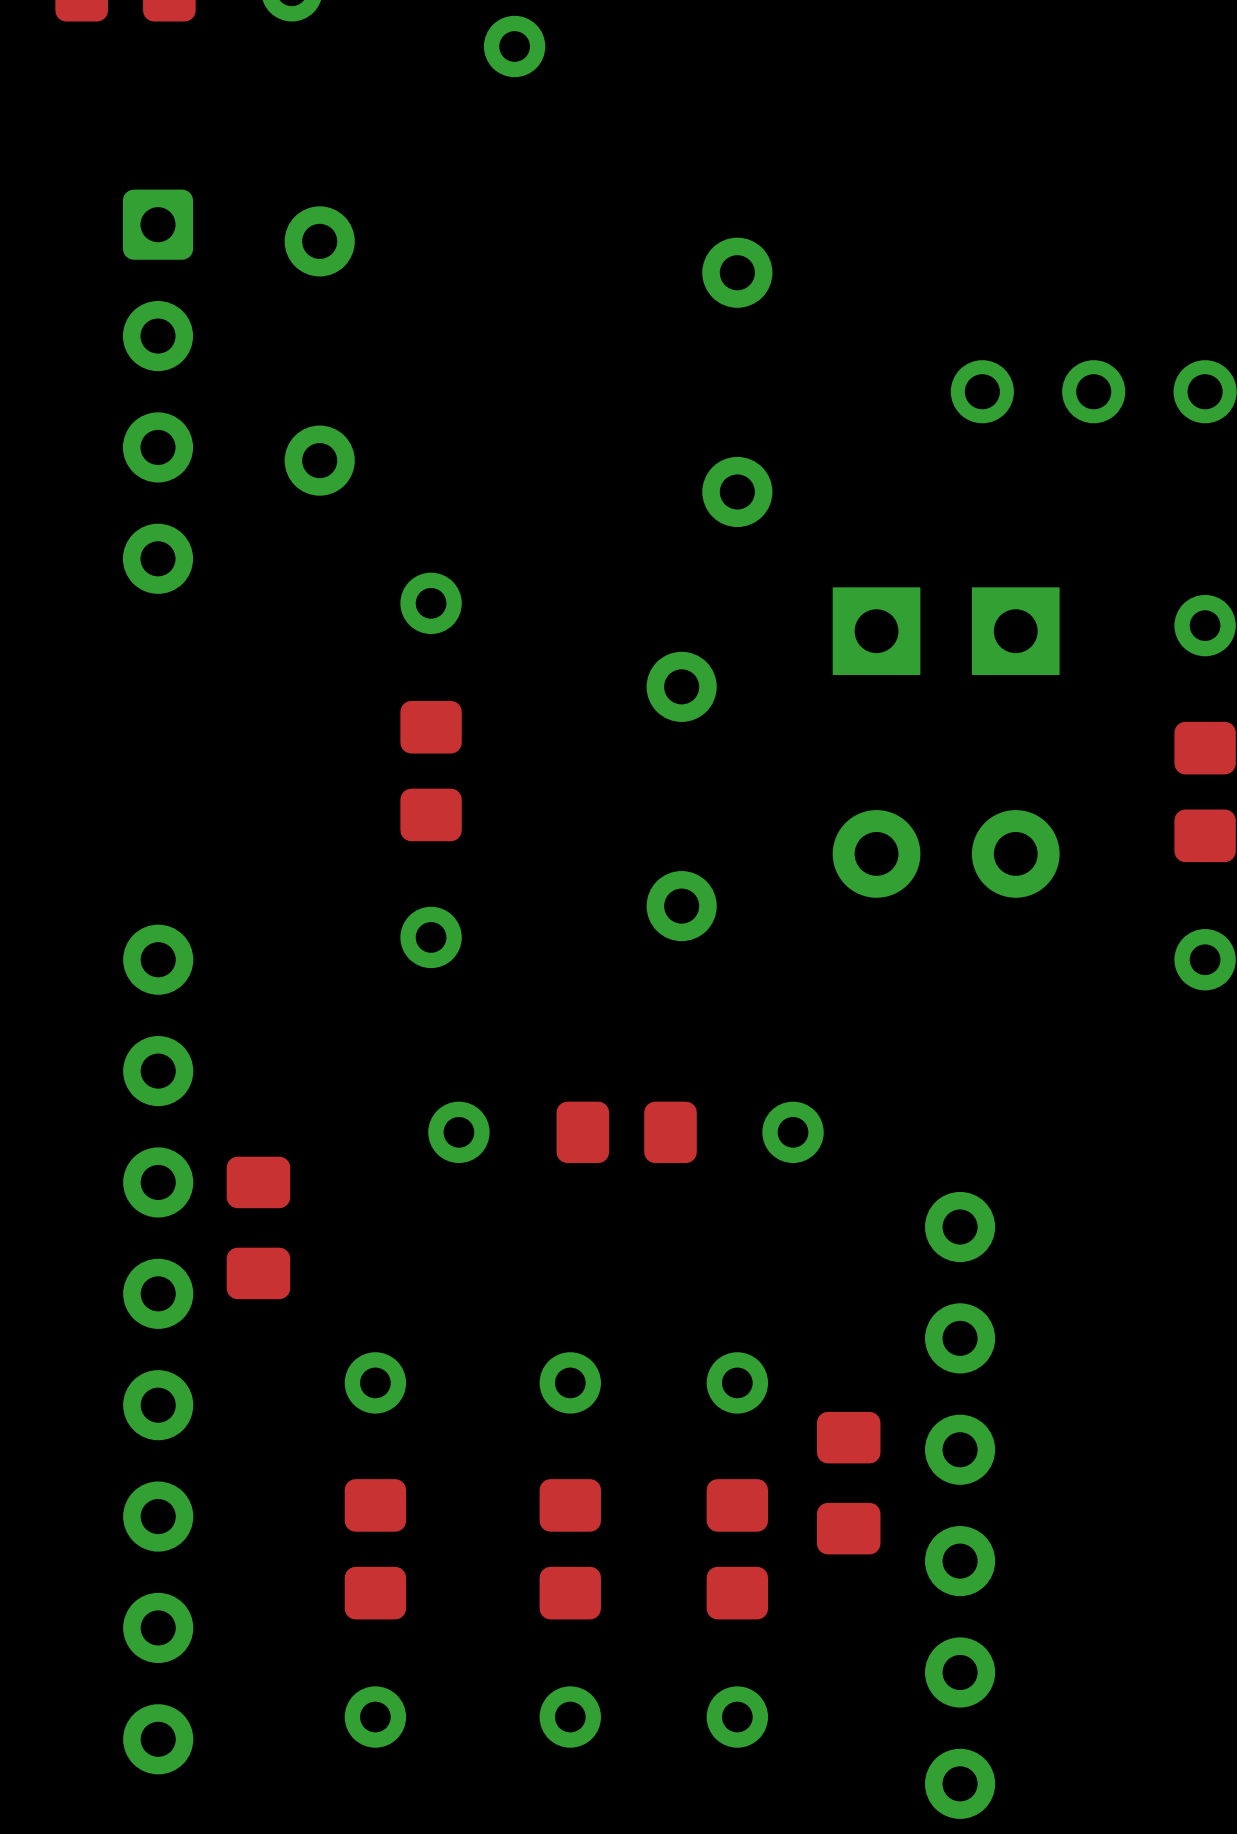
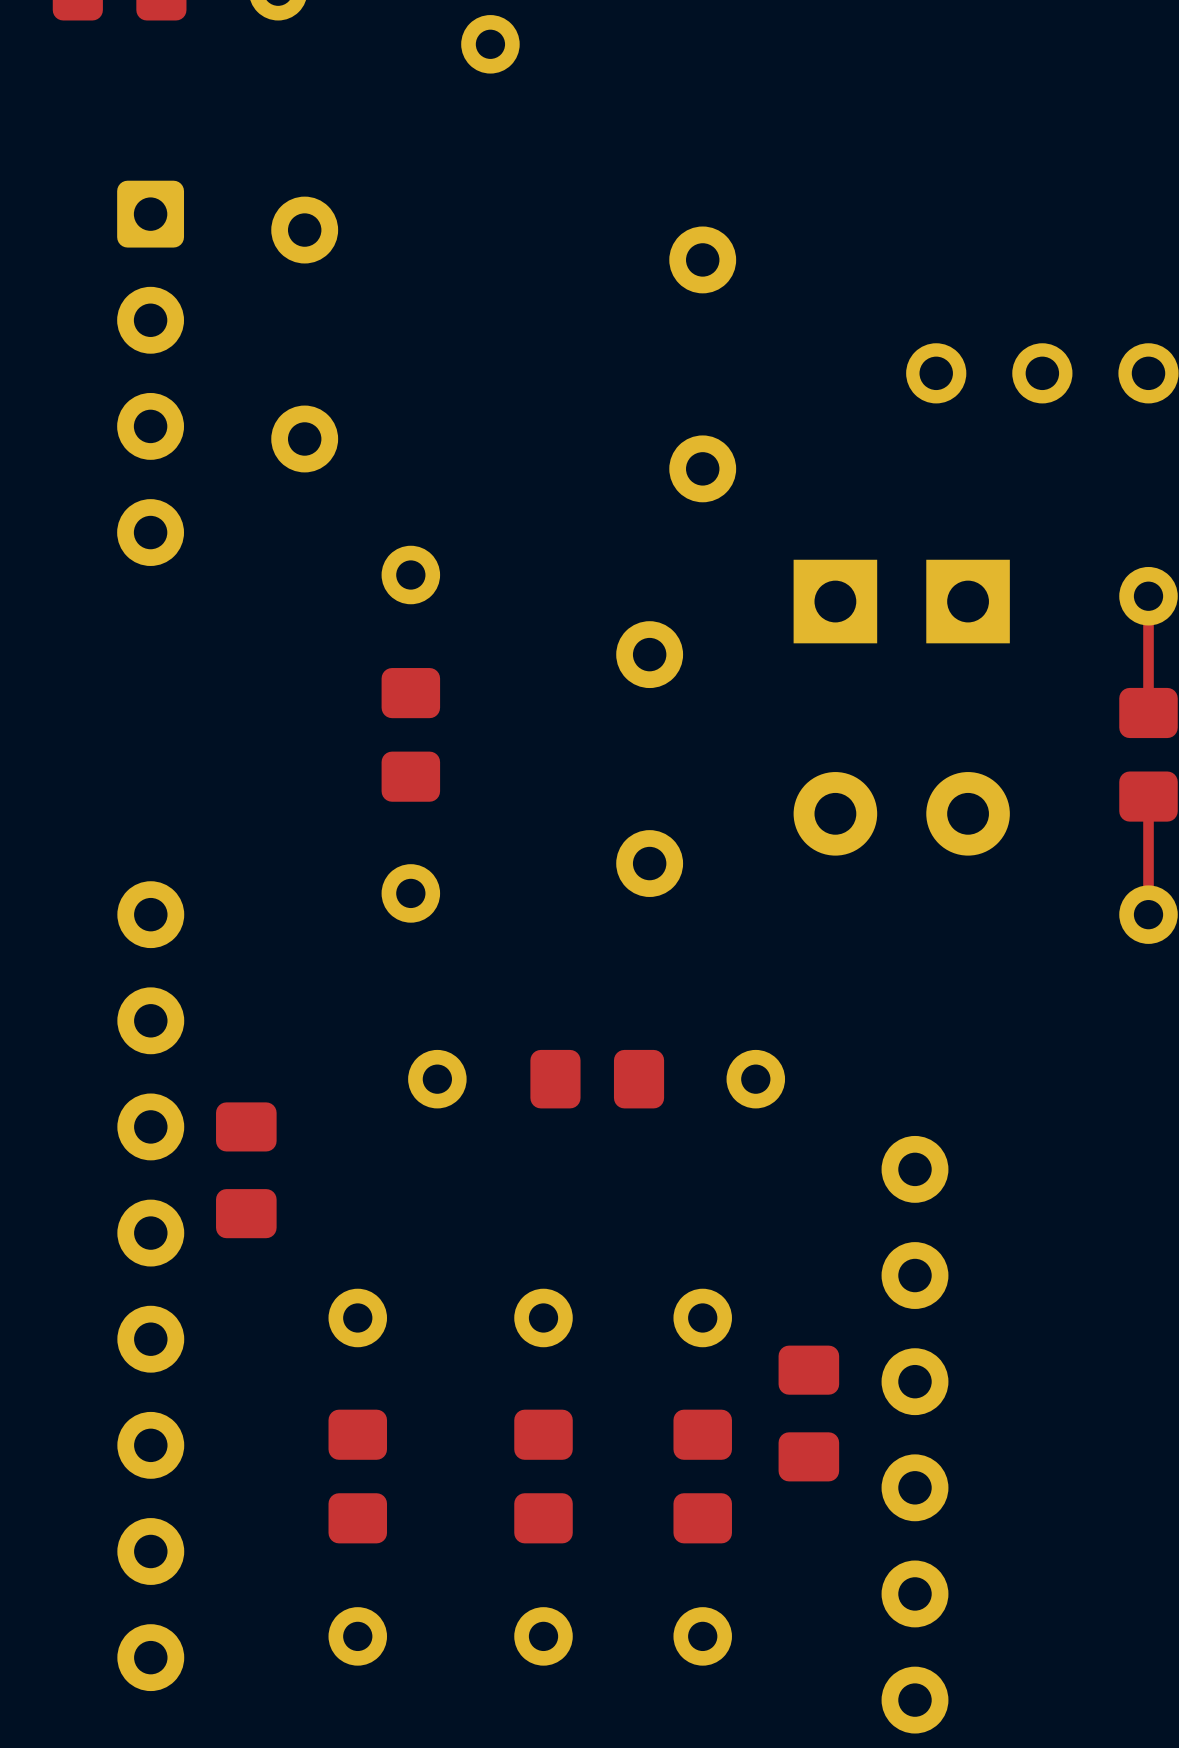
top track: none -> (1148, 596) (1148, 712)
top track: none -> (1148, 796) (1148, 914)

